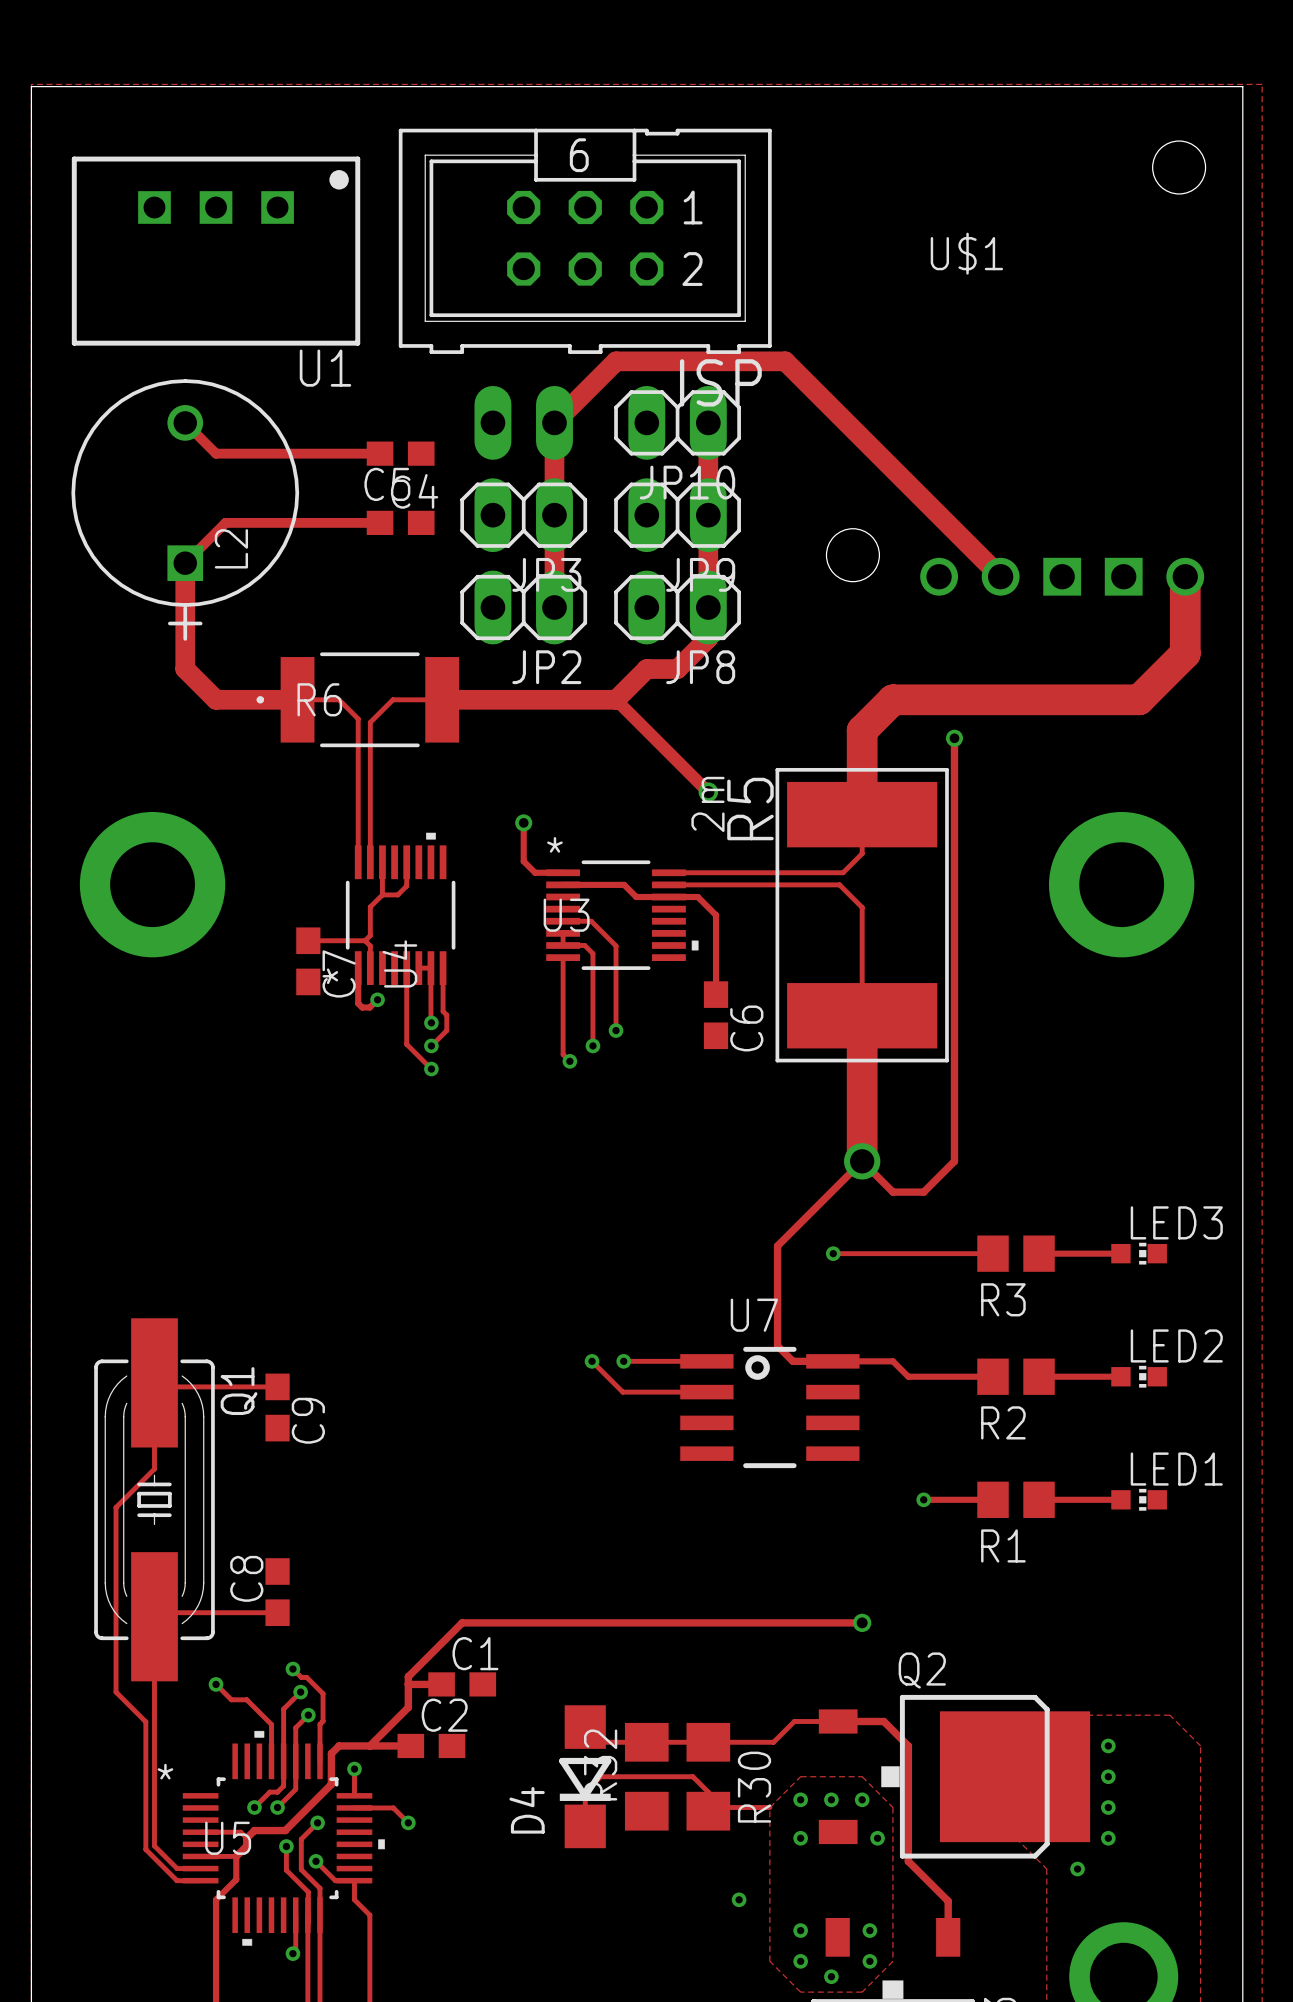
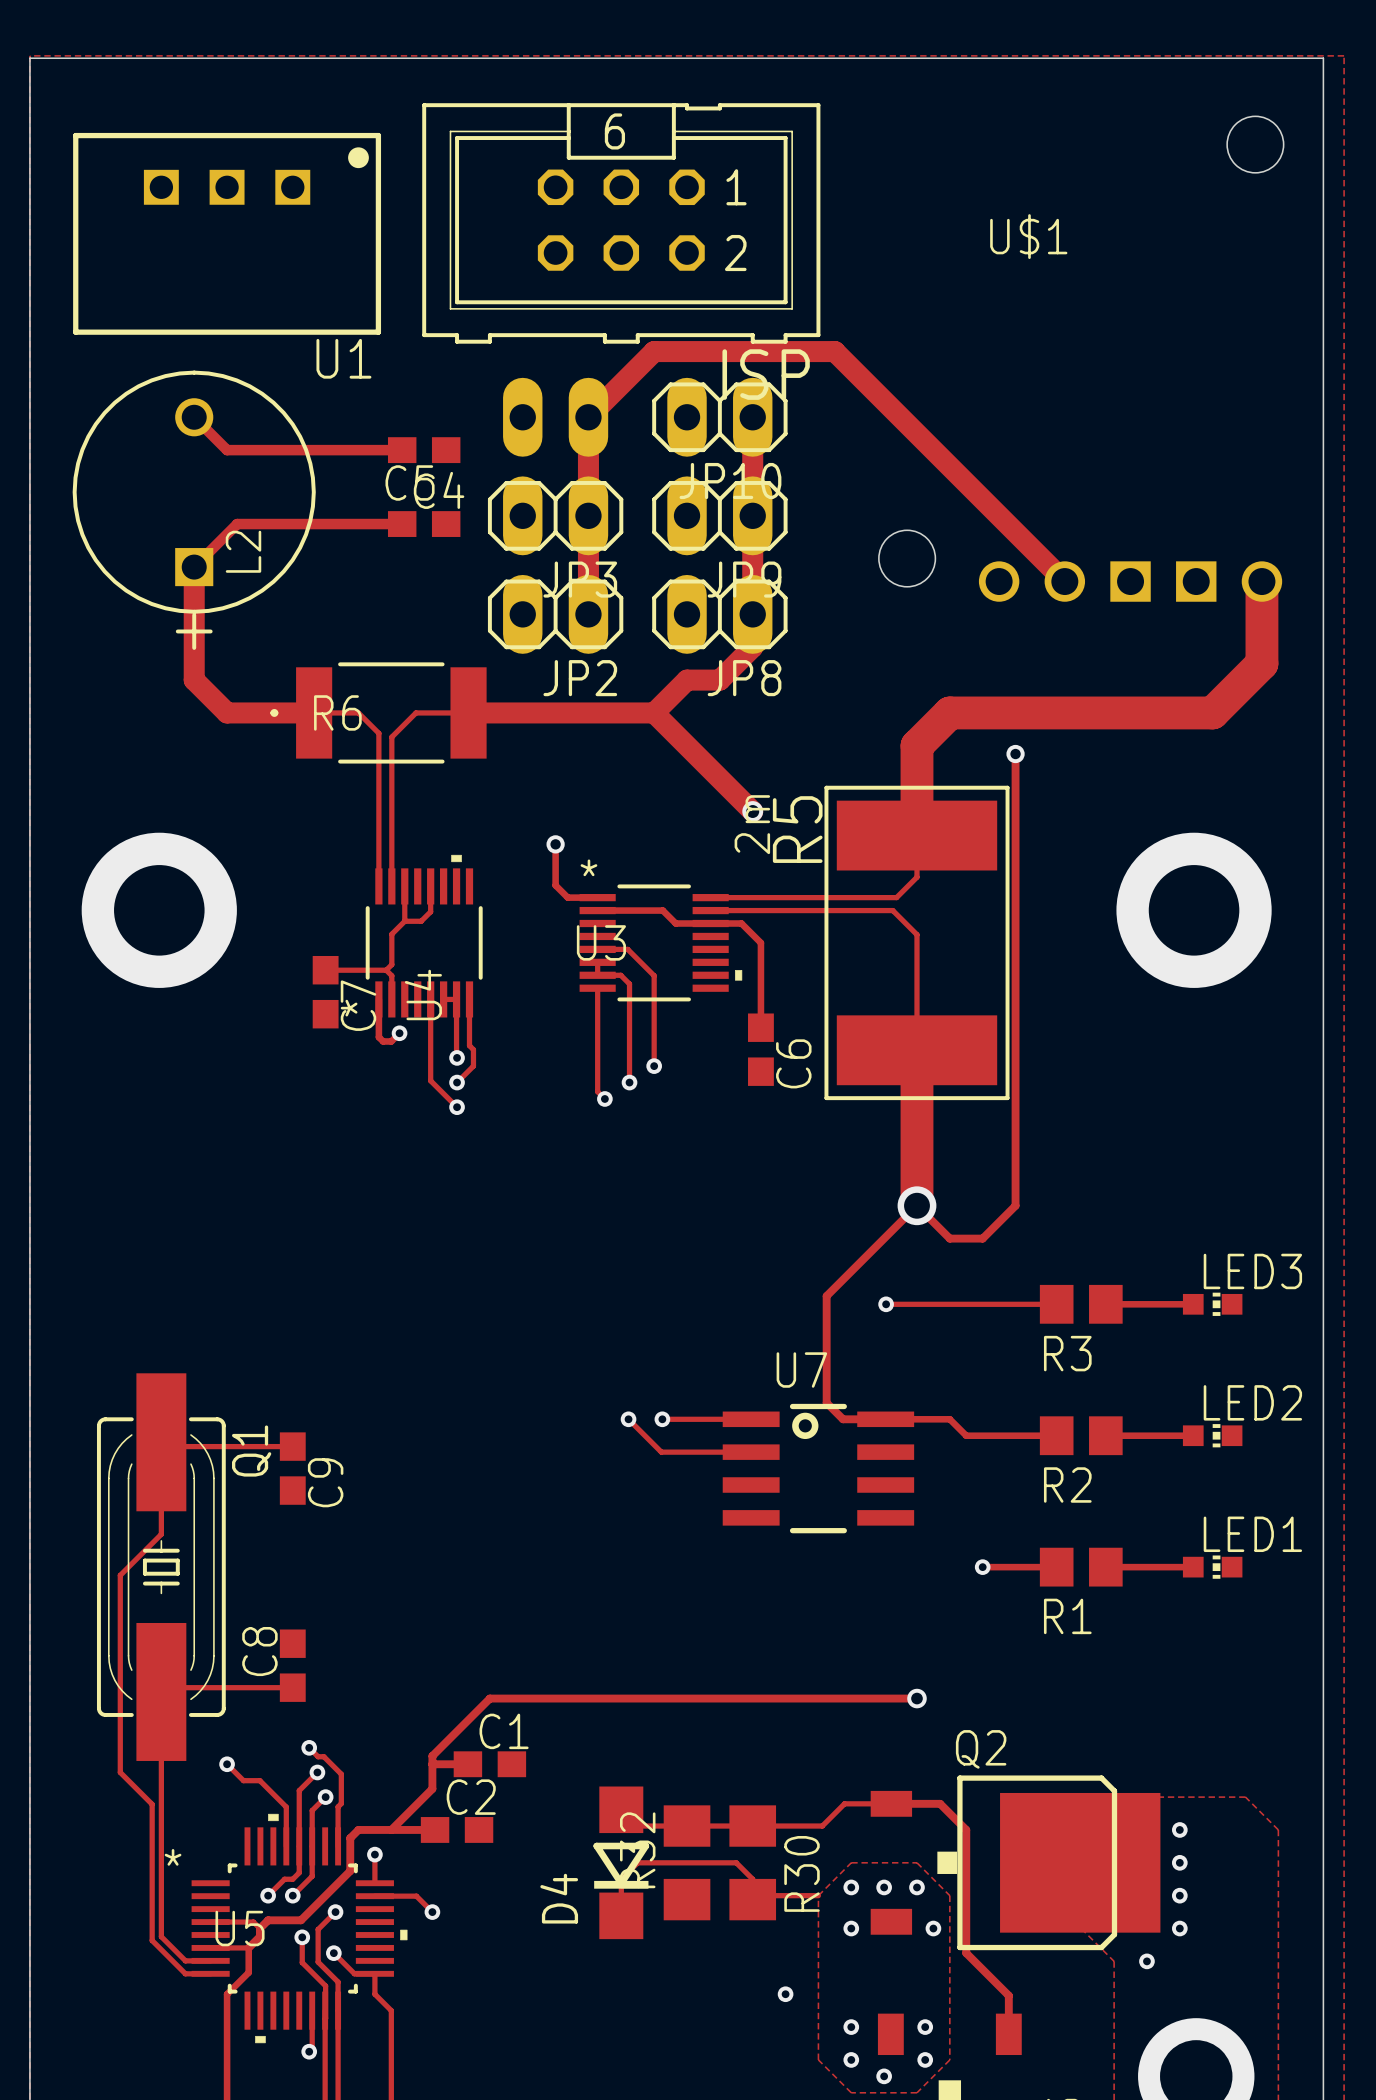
track width: thin (616, 699) (708, 792) -> thick (654, 712) (752, 811)

